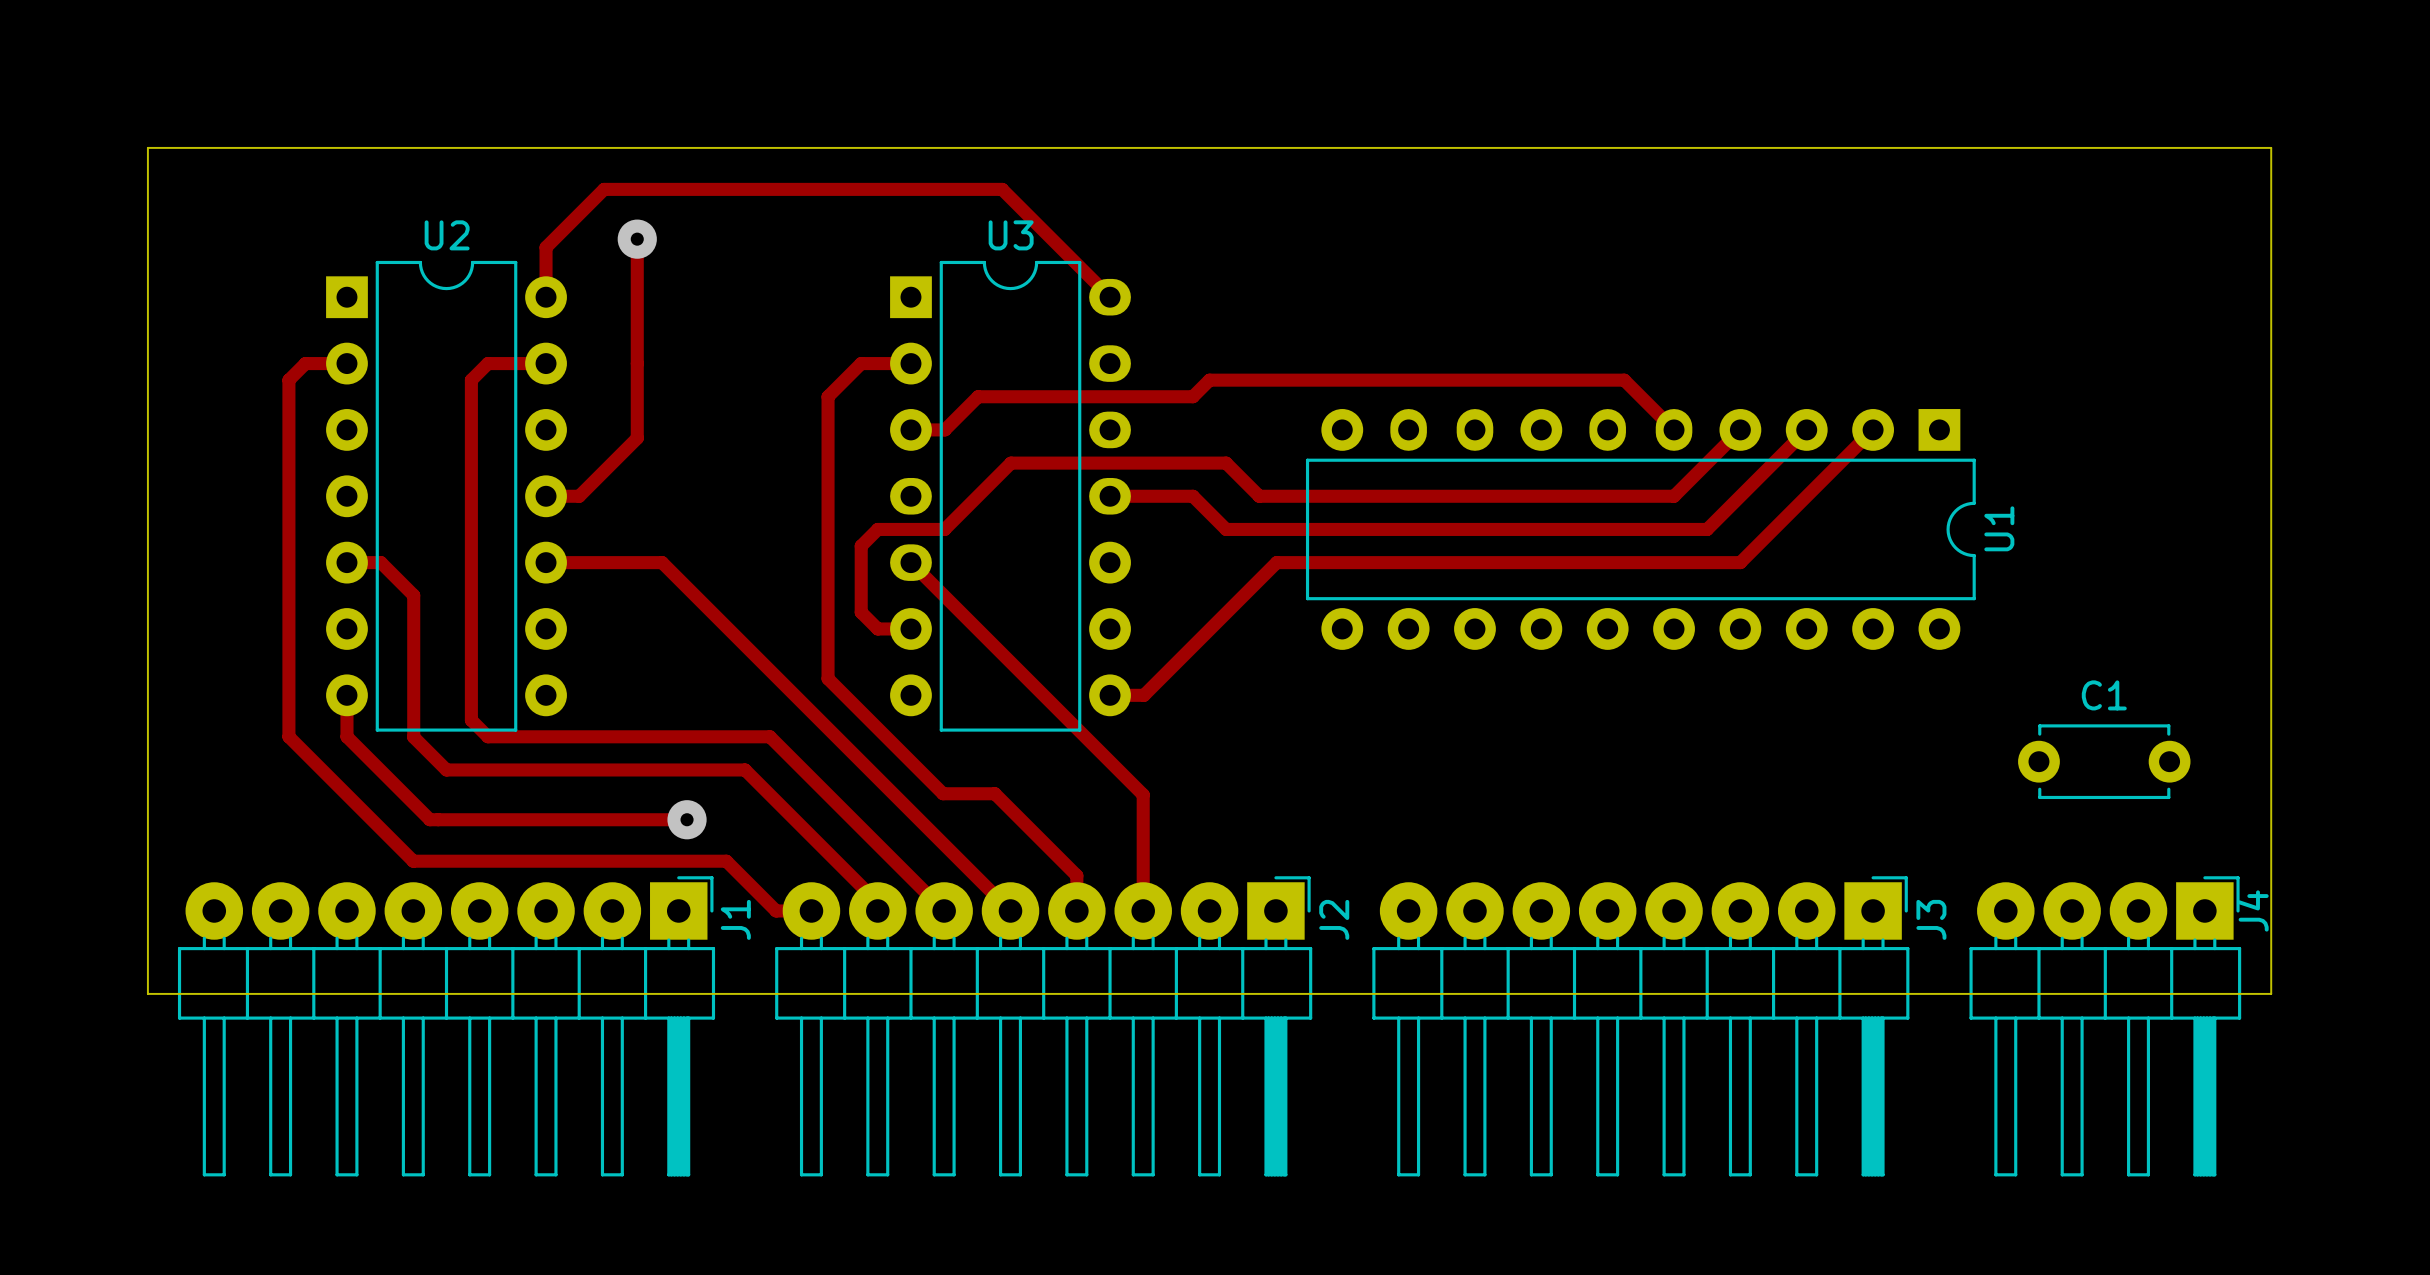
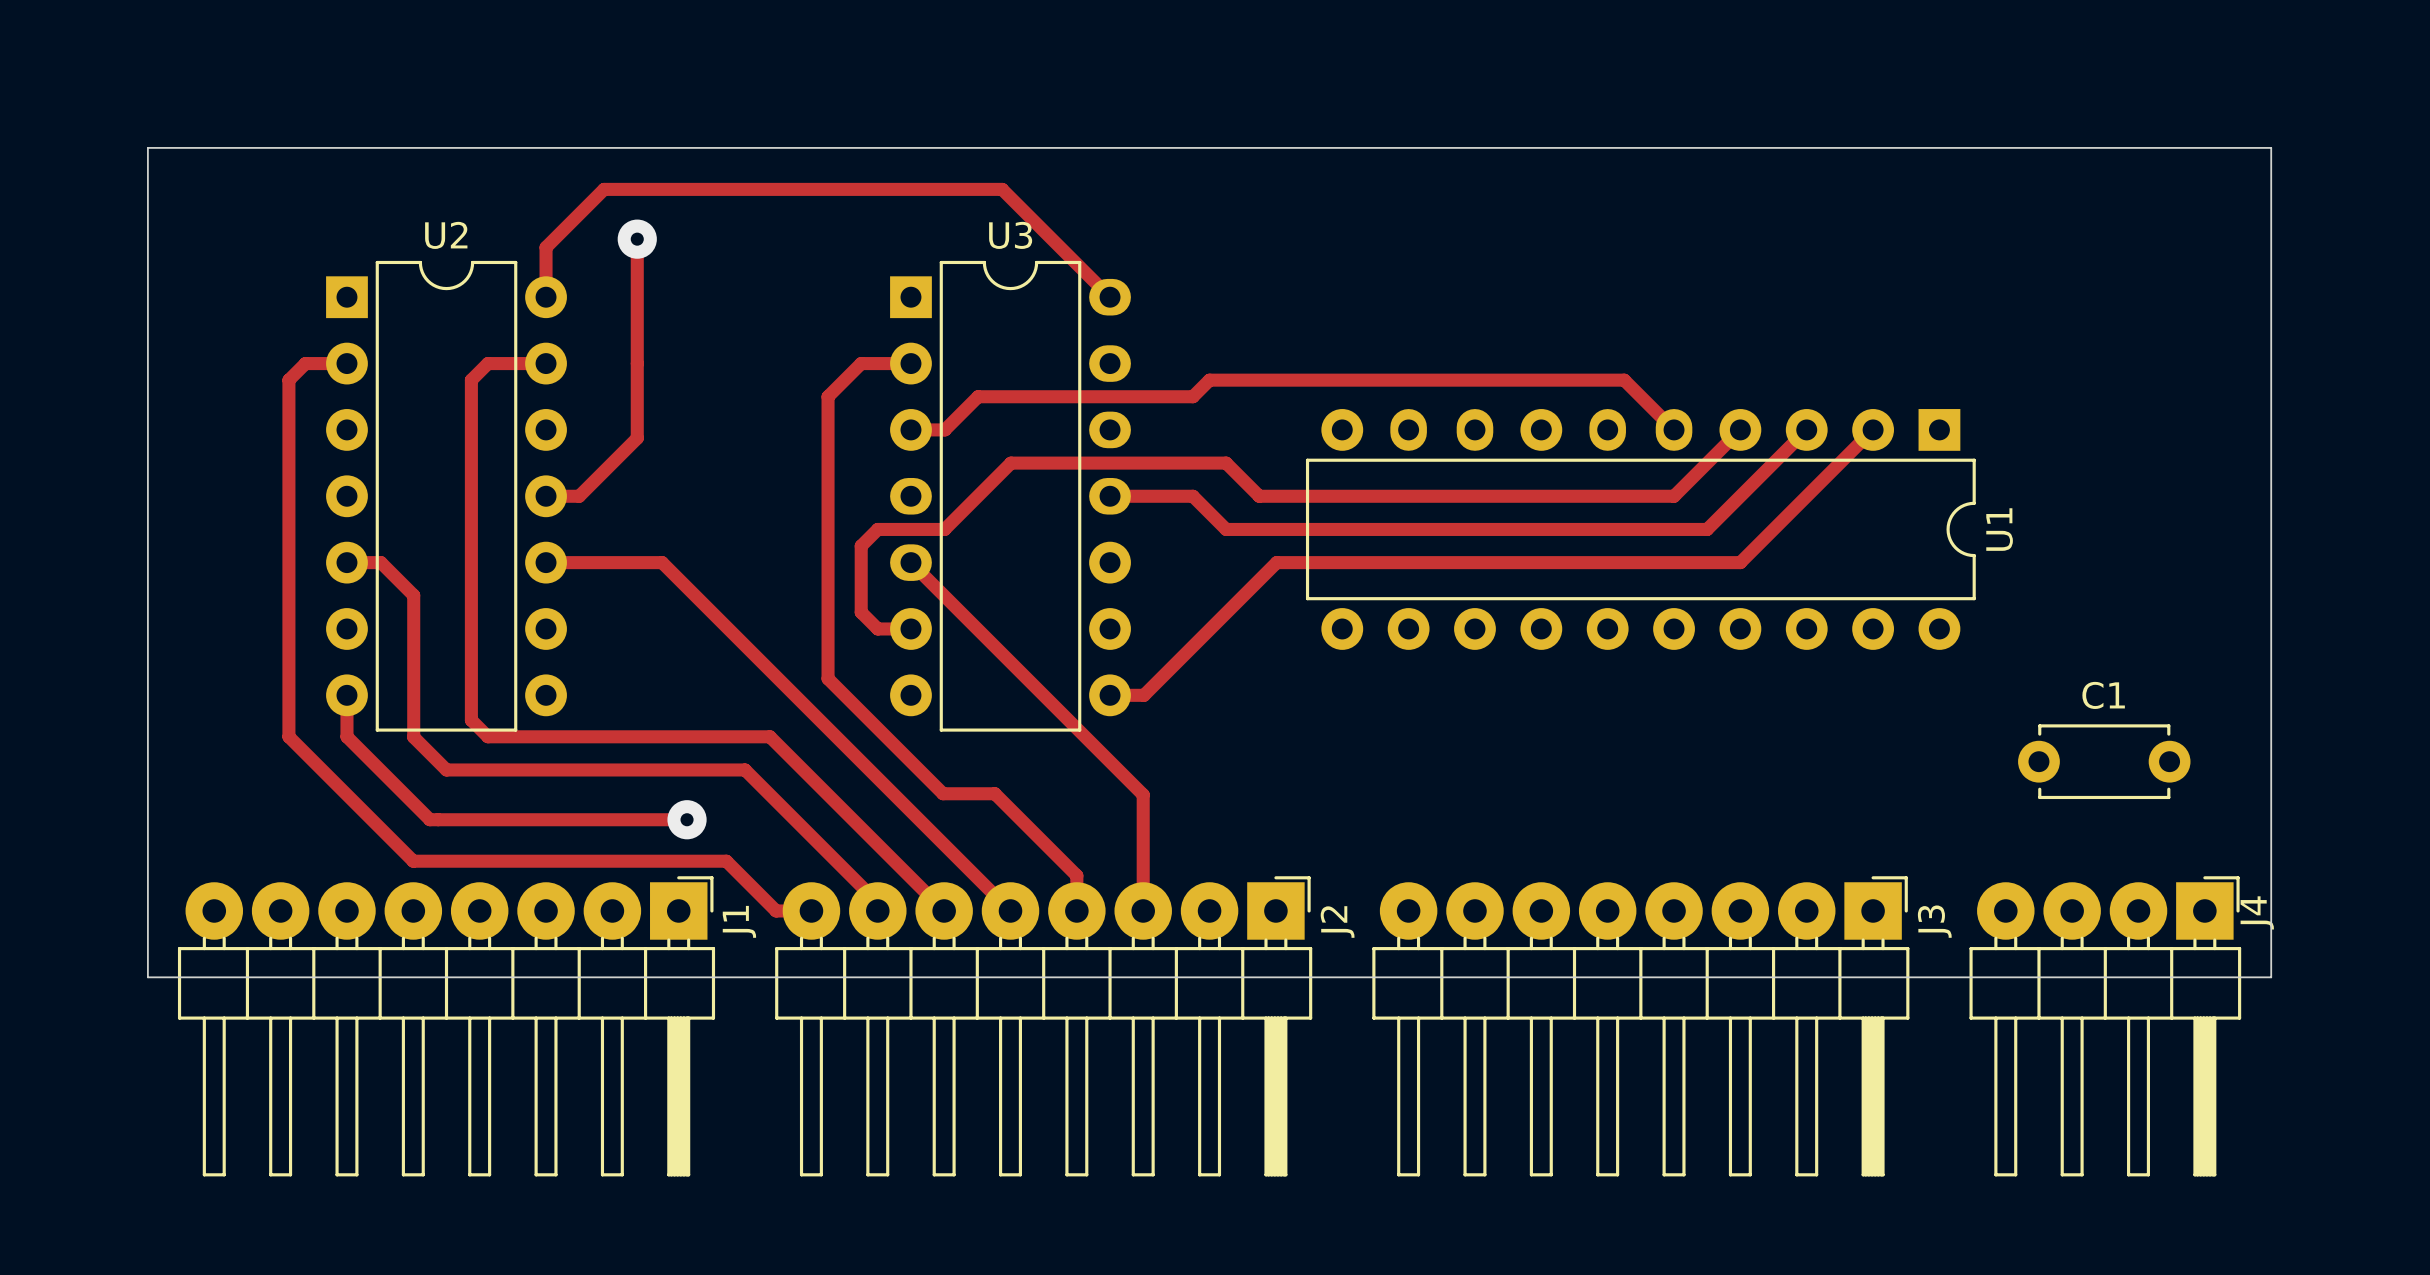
board edge: (147, 977) (147, 993) (2271, 993) (2271, 977) -> (147, 977) (2271, 977)

